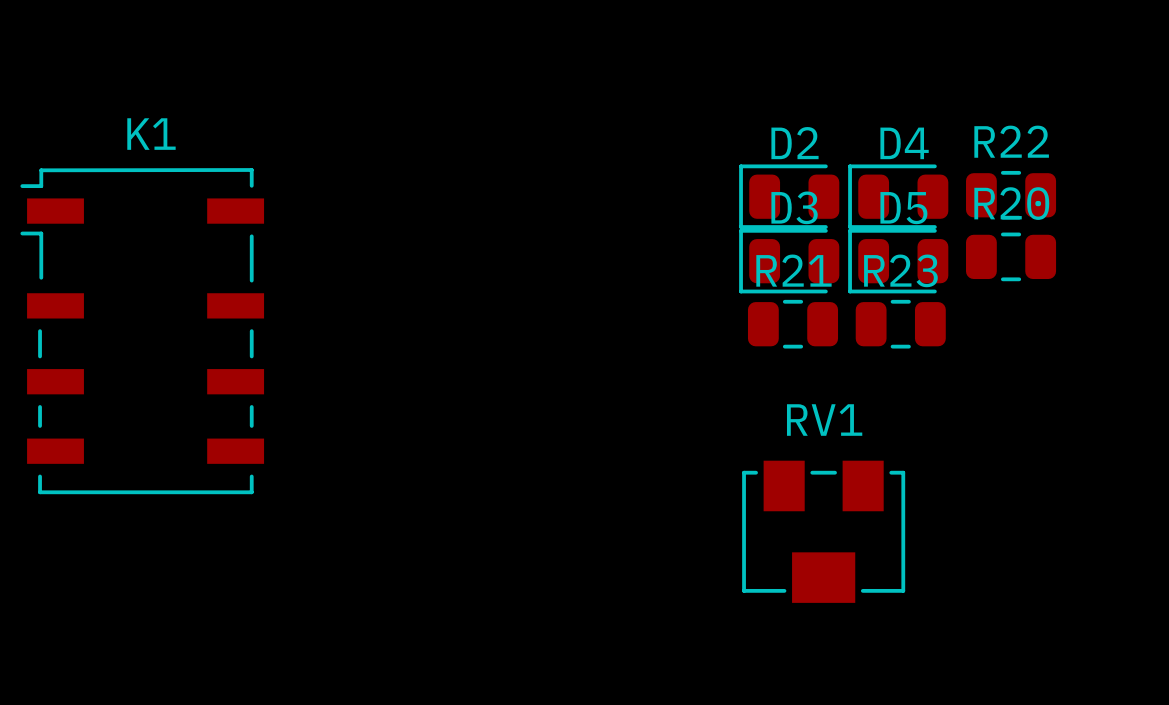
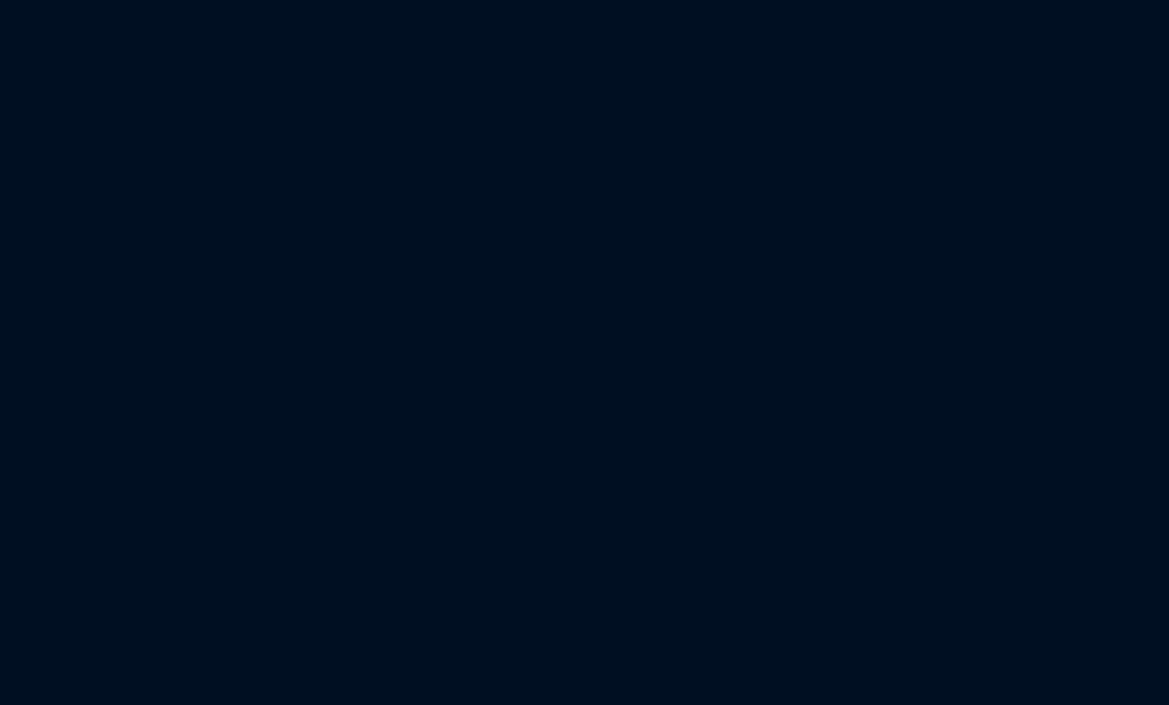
R22: (1011, 195) -> none
D2: (789, 196) -> none
D4: (898, 196) -> none
R20: (1011, 256) -> none
D3: (789, 261) -> none
D5: (898, 261) -> none
R21: (793, 324) -> none
R23: (900, 324) -> none
K1: (142, 331) -> none
RV1: (823, 531) -> none

